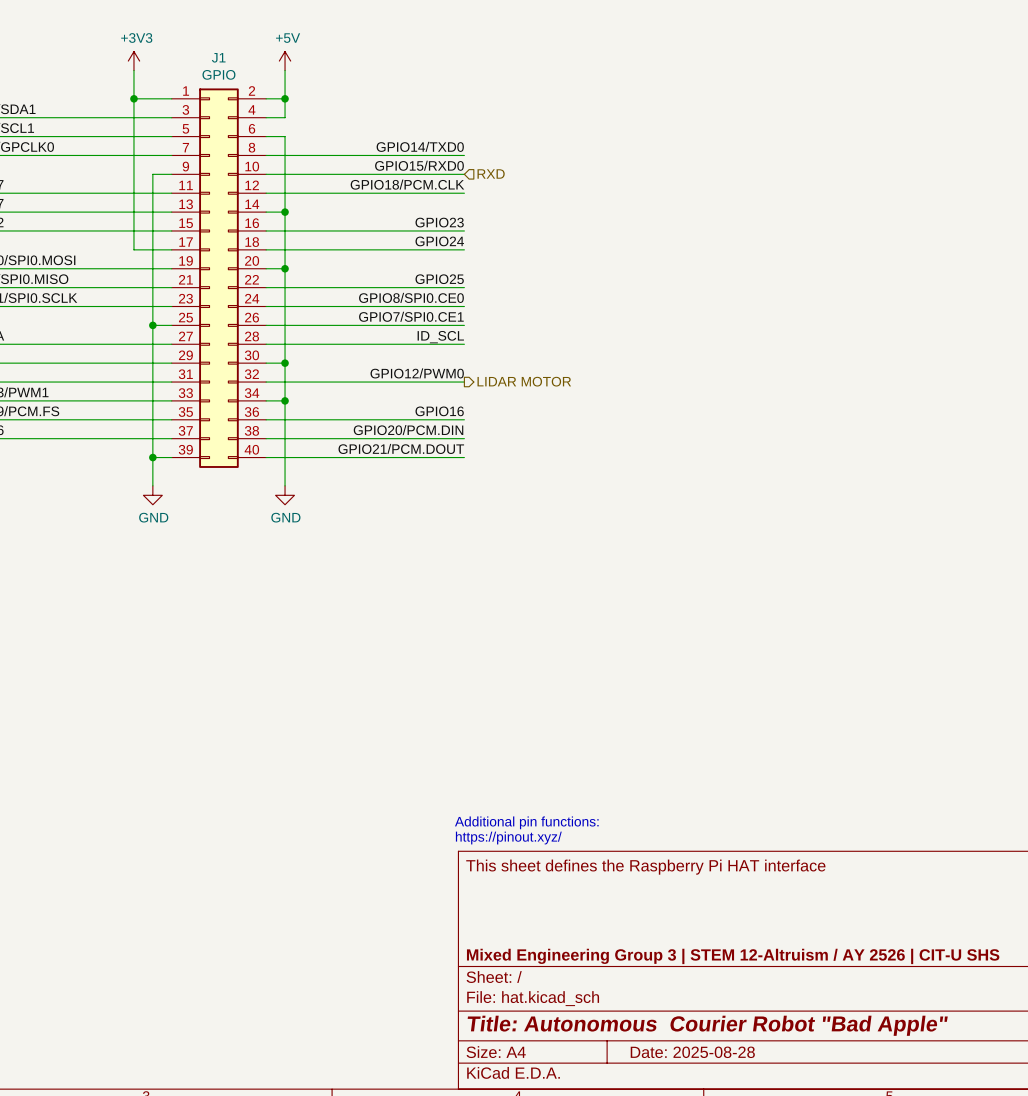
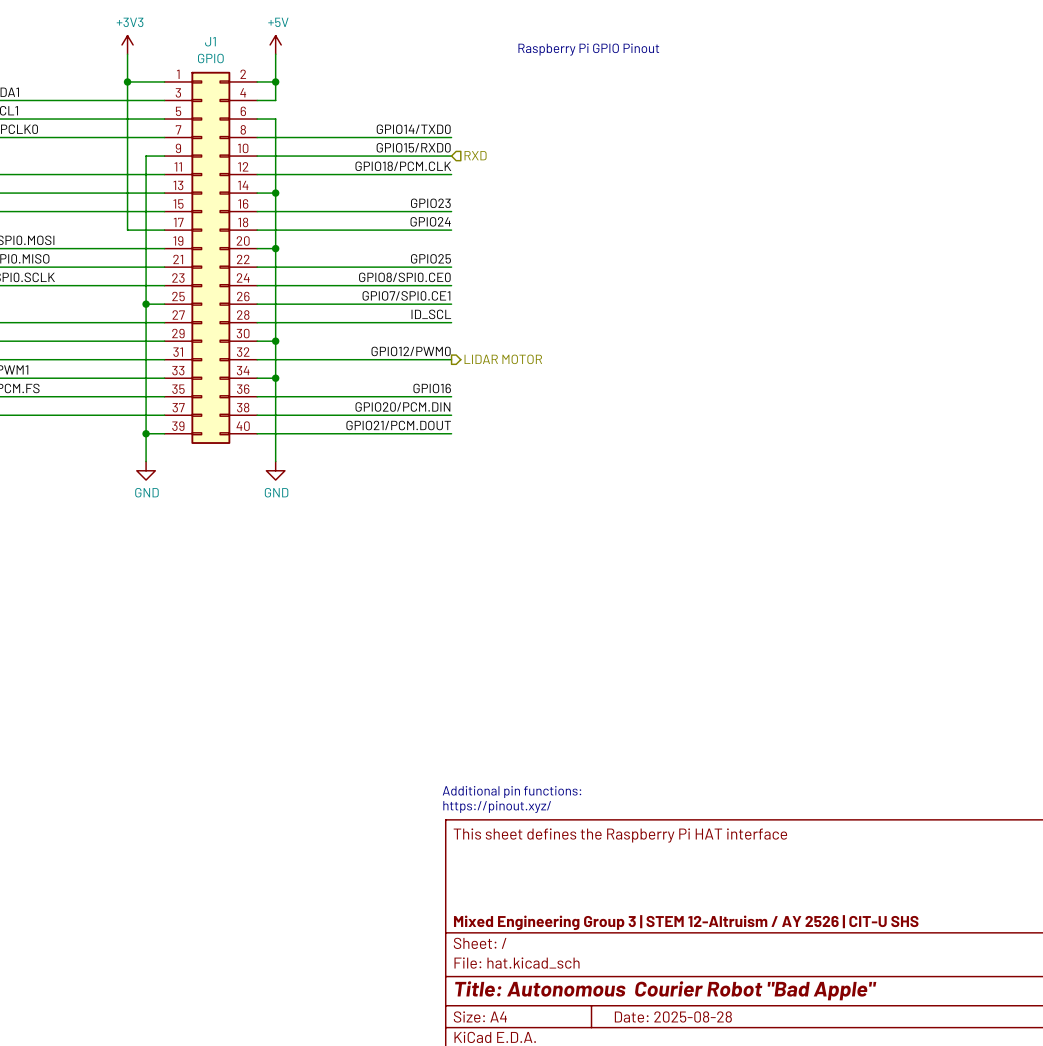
text: none -> Raspberry Pi GPIO Pinout (588, 49)

